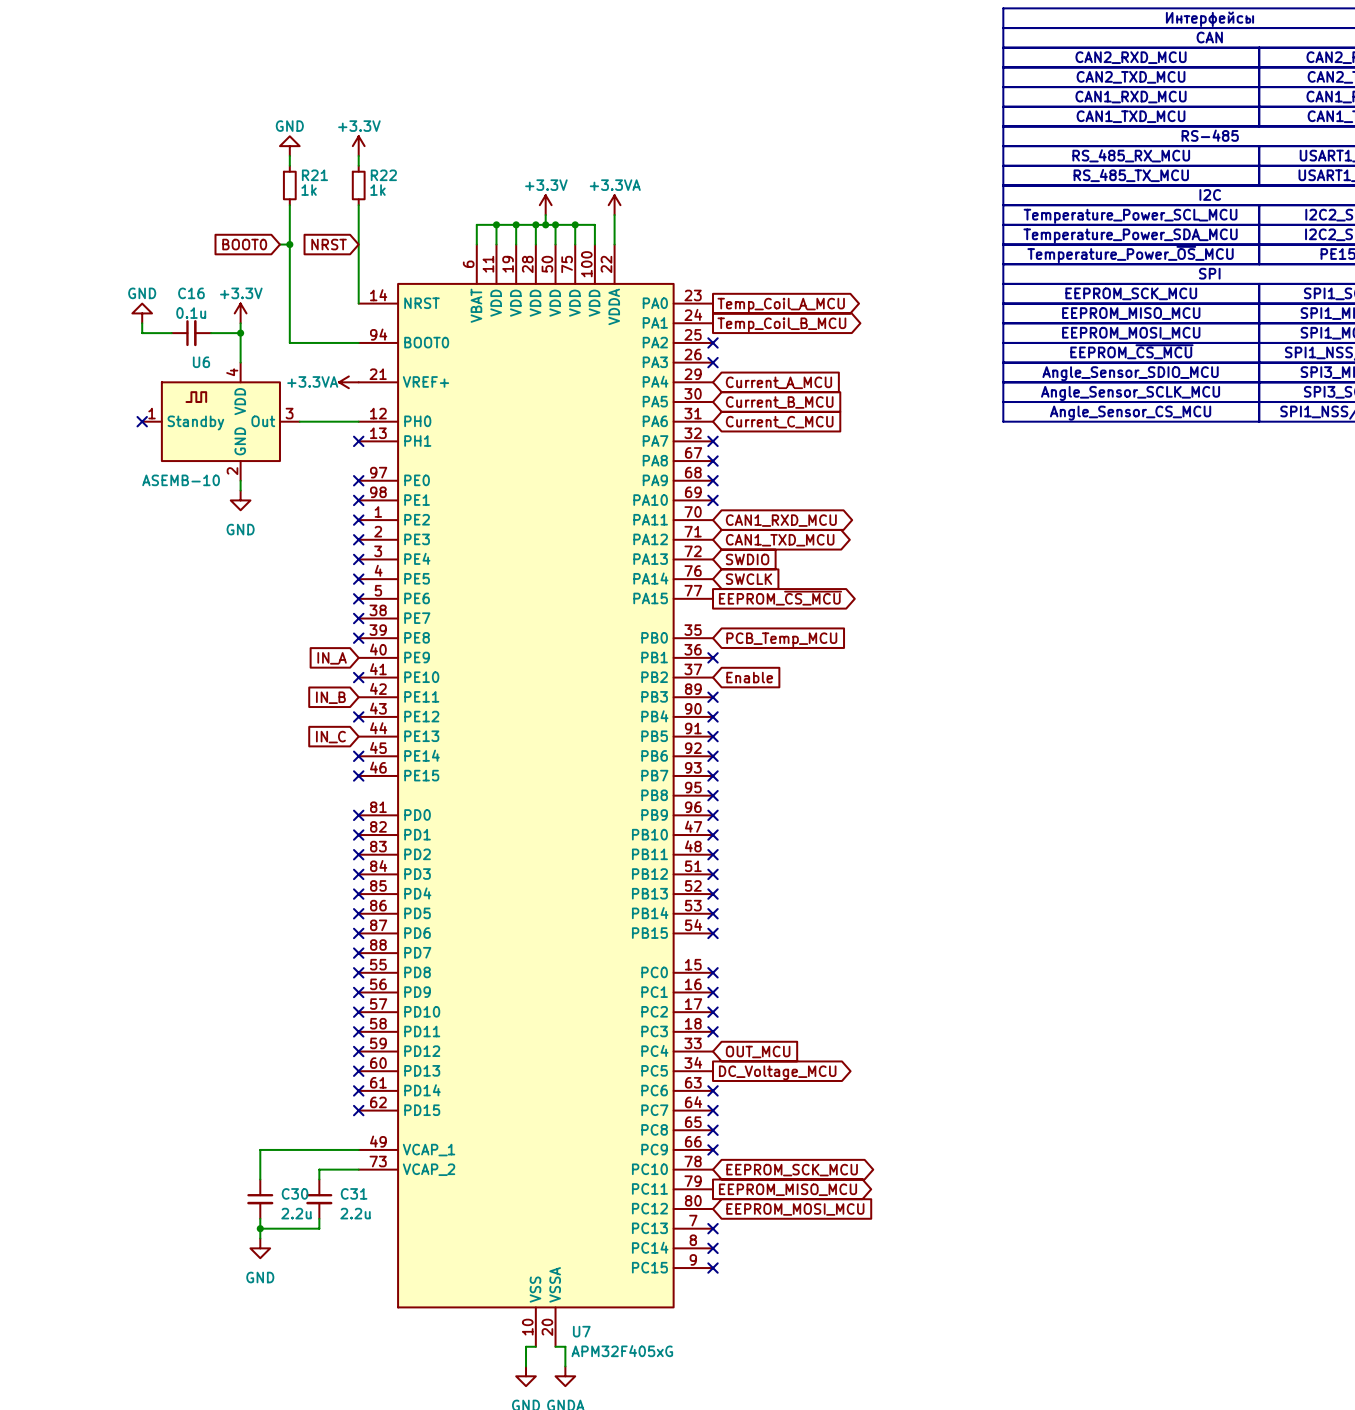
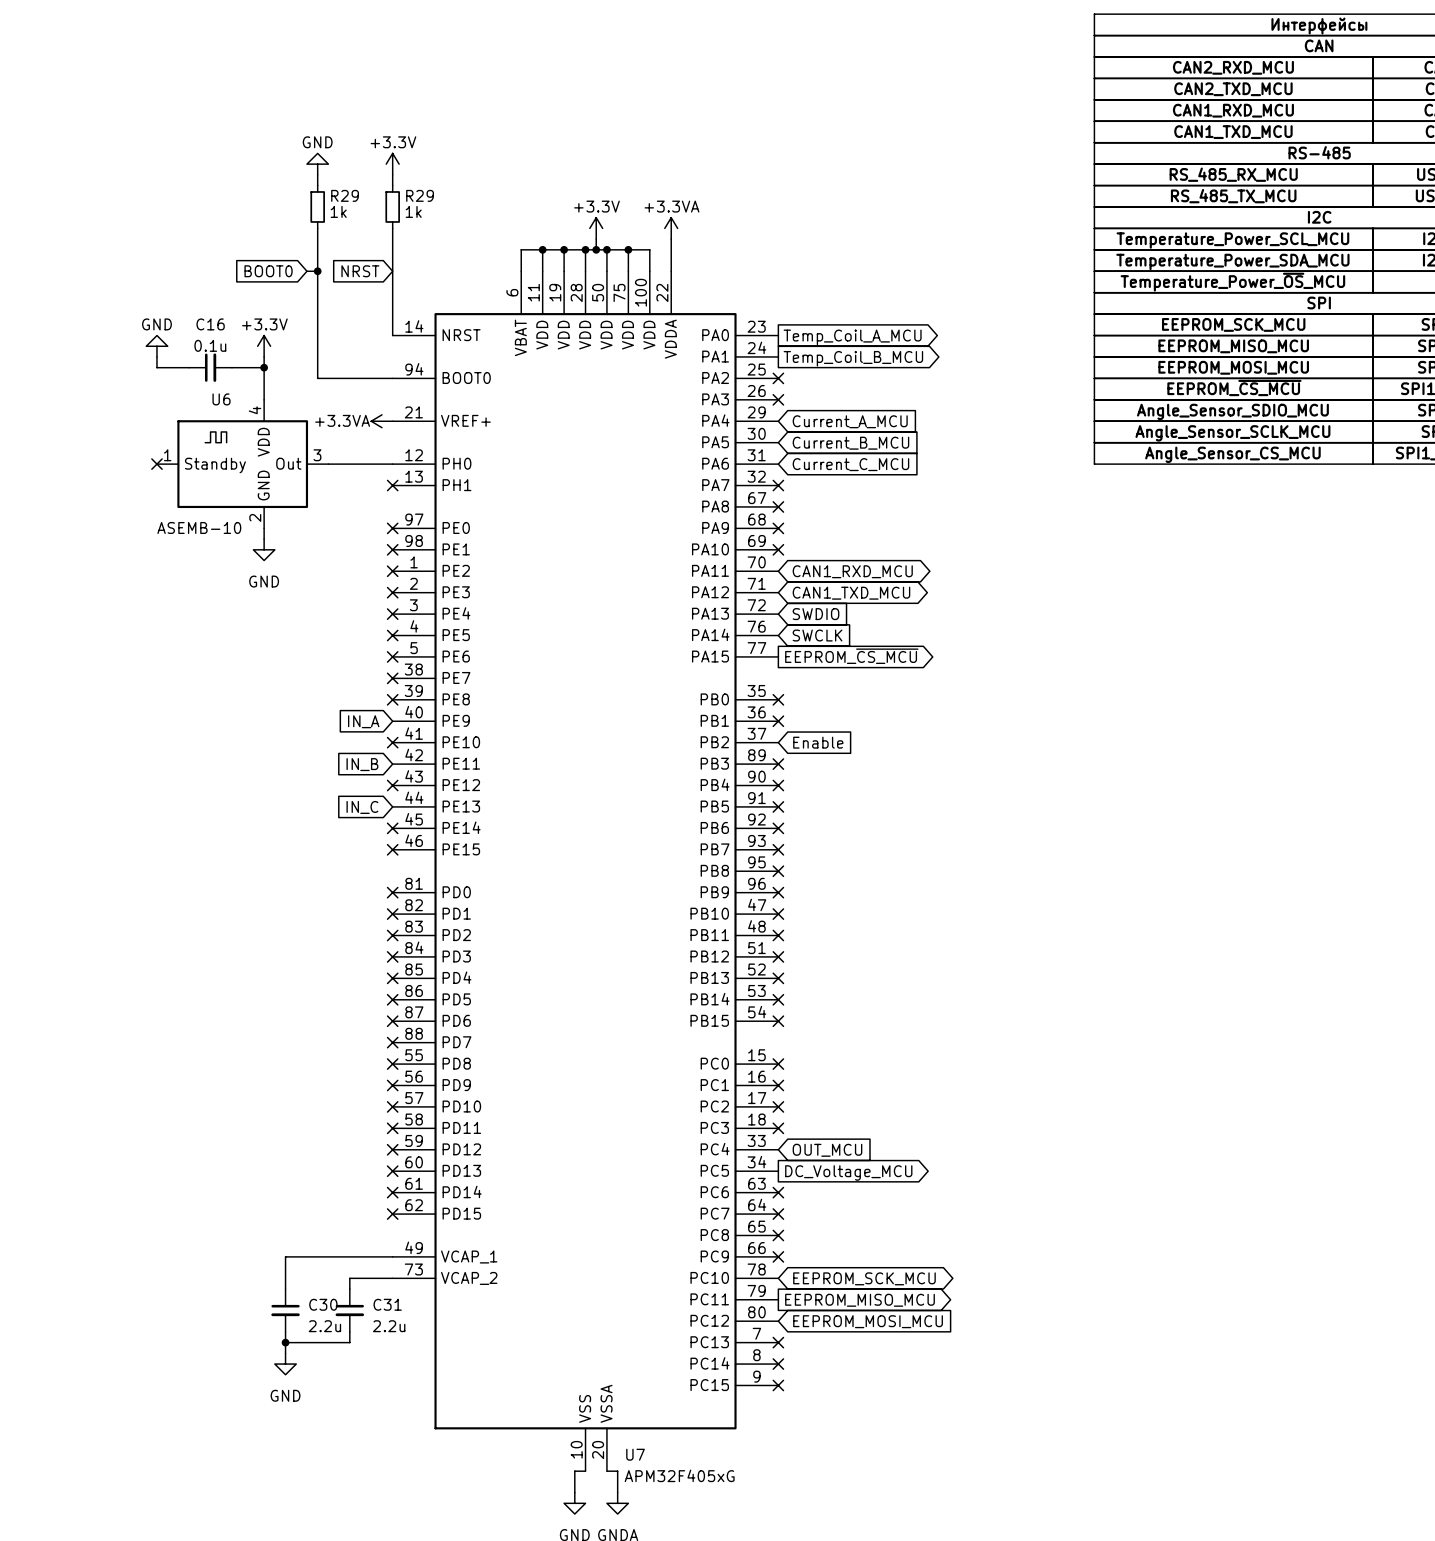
R21 name: R21 (314, 175) -> R29 (345, 195)
R22 name: R22 (383, 175) -> R29 (420, 195)
no-connect mark: none -> (778, 699)
global label: PCB_Temp_MCU (781, 639) -> none

